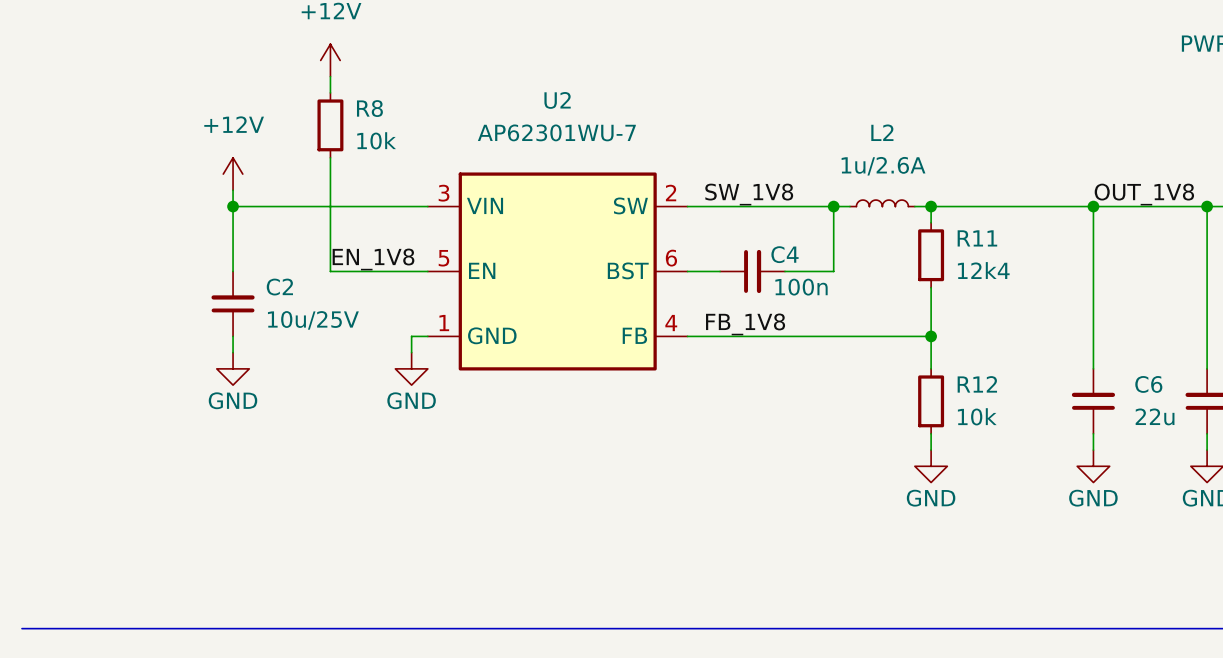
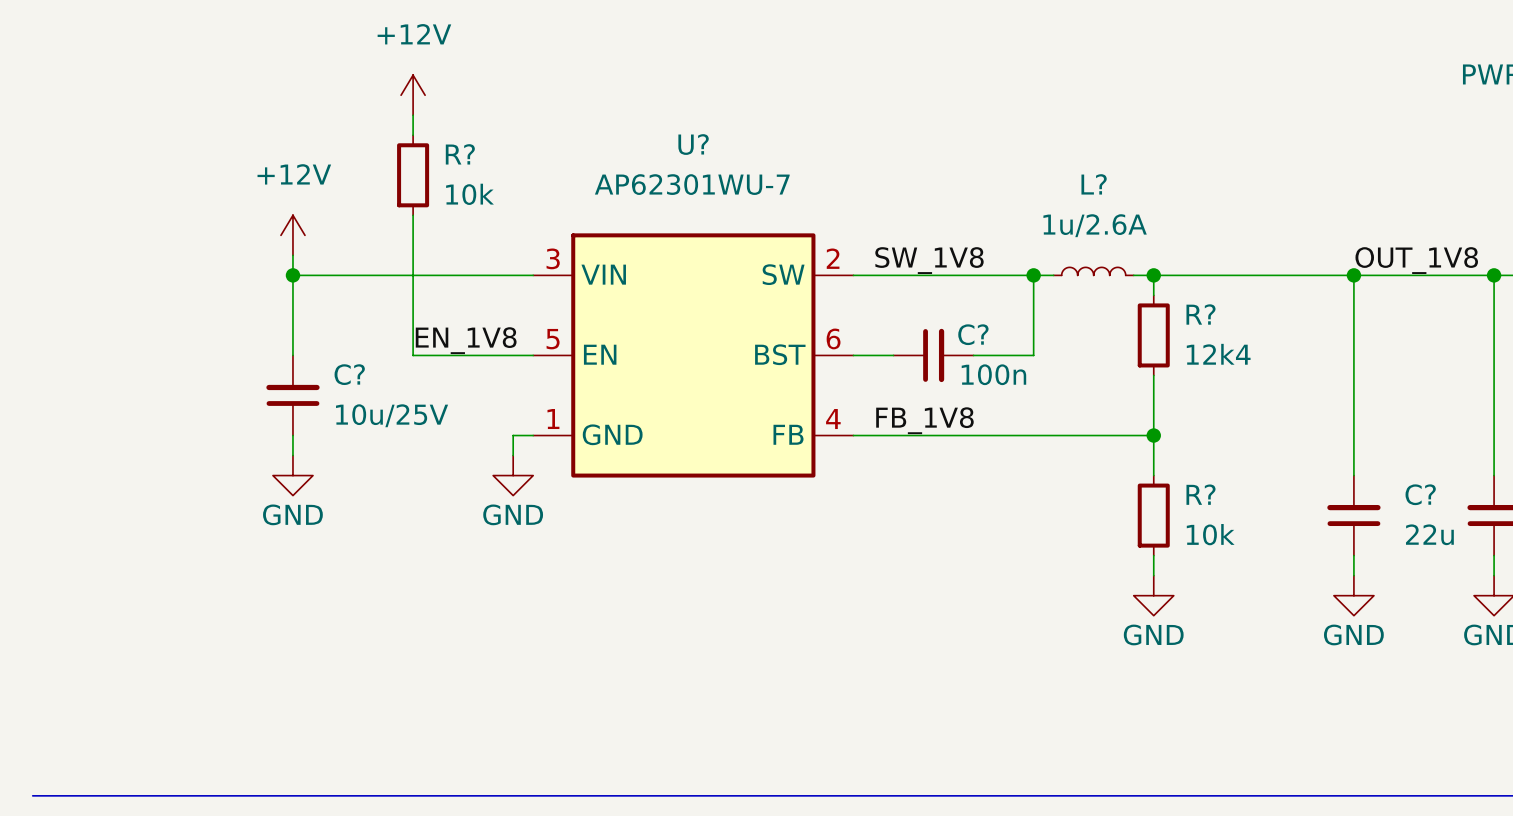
U2 name: U2 (557, 100) -> U? (693, 144)
R8 name: R8 (369, 108) -> R? (460, 154)
L2 name: L2 (882, 132) -> L? (1094, 184)
R11 name: R11 (977, 238) -> R? (1200, 314)
C4 name: C4 (785, 254) -> C? (973, 334)
C2 name: C2 (279, 287) -> C? (349, 374)
R12 name: R12 (977, 384) -> R? (1200, 494)
C6 name: C6 (1148, 384) -> C? (1420, 494)

